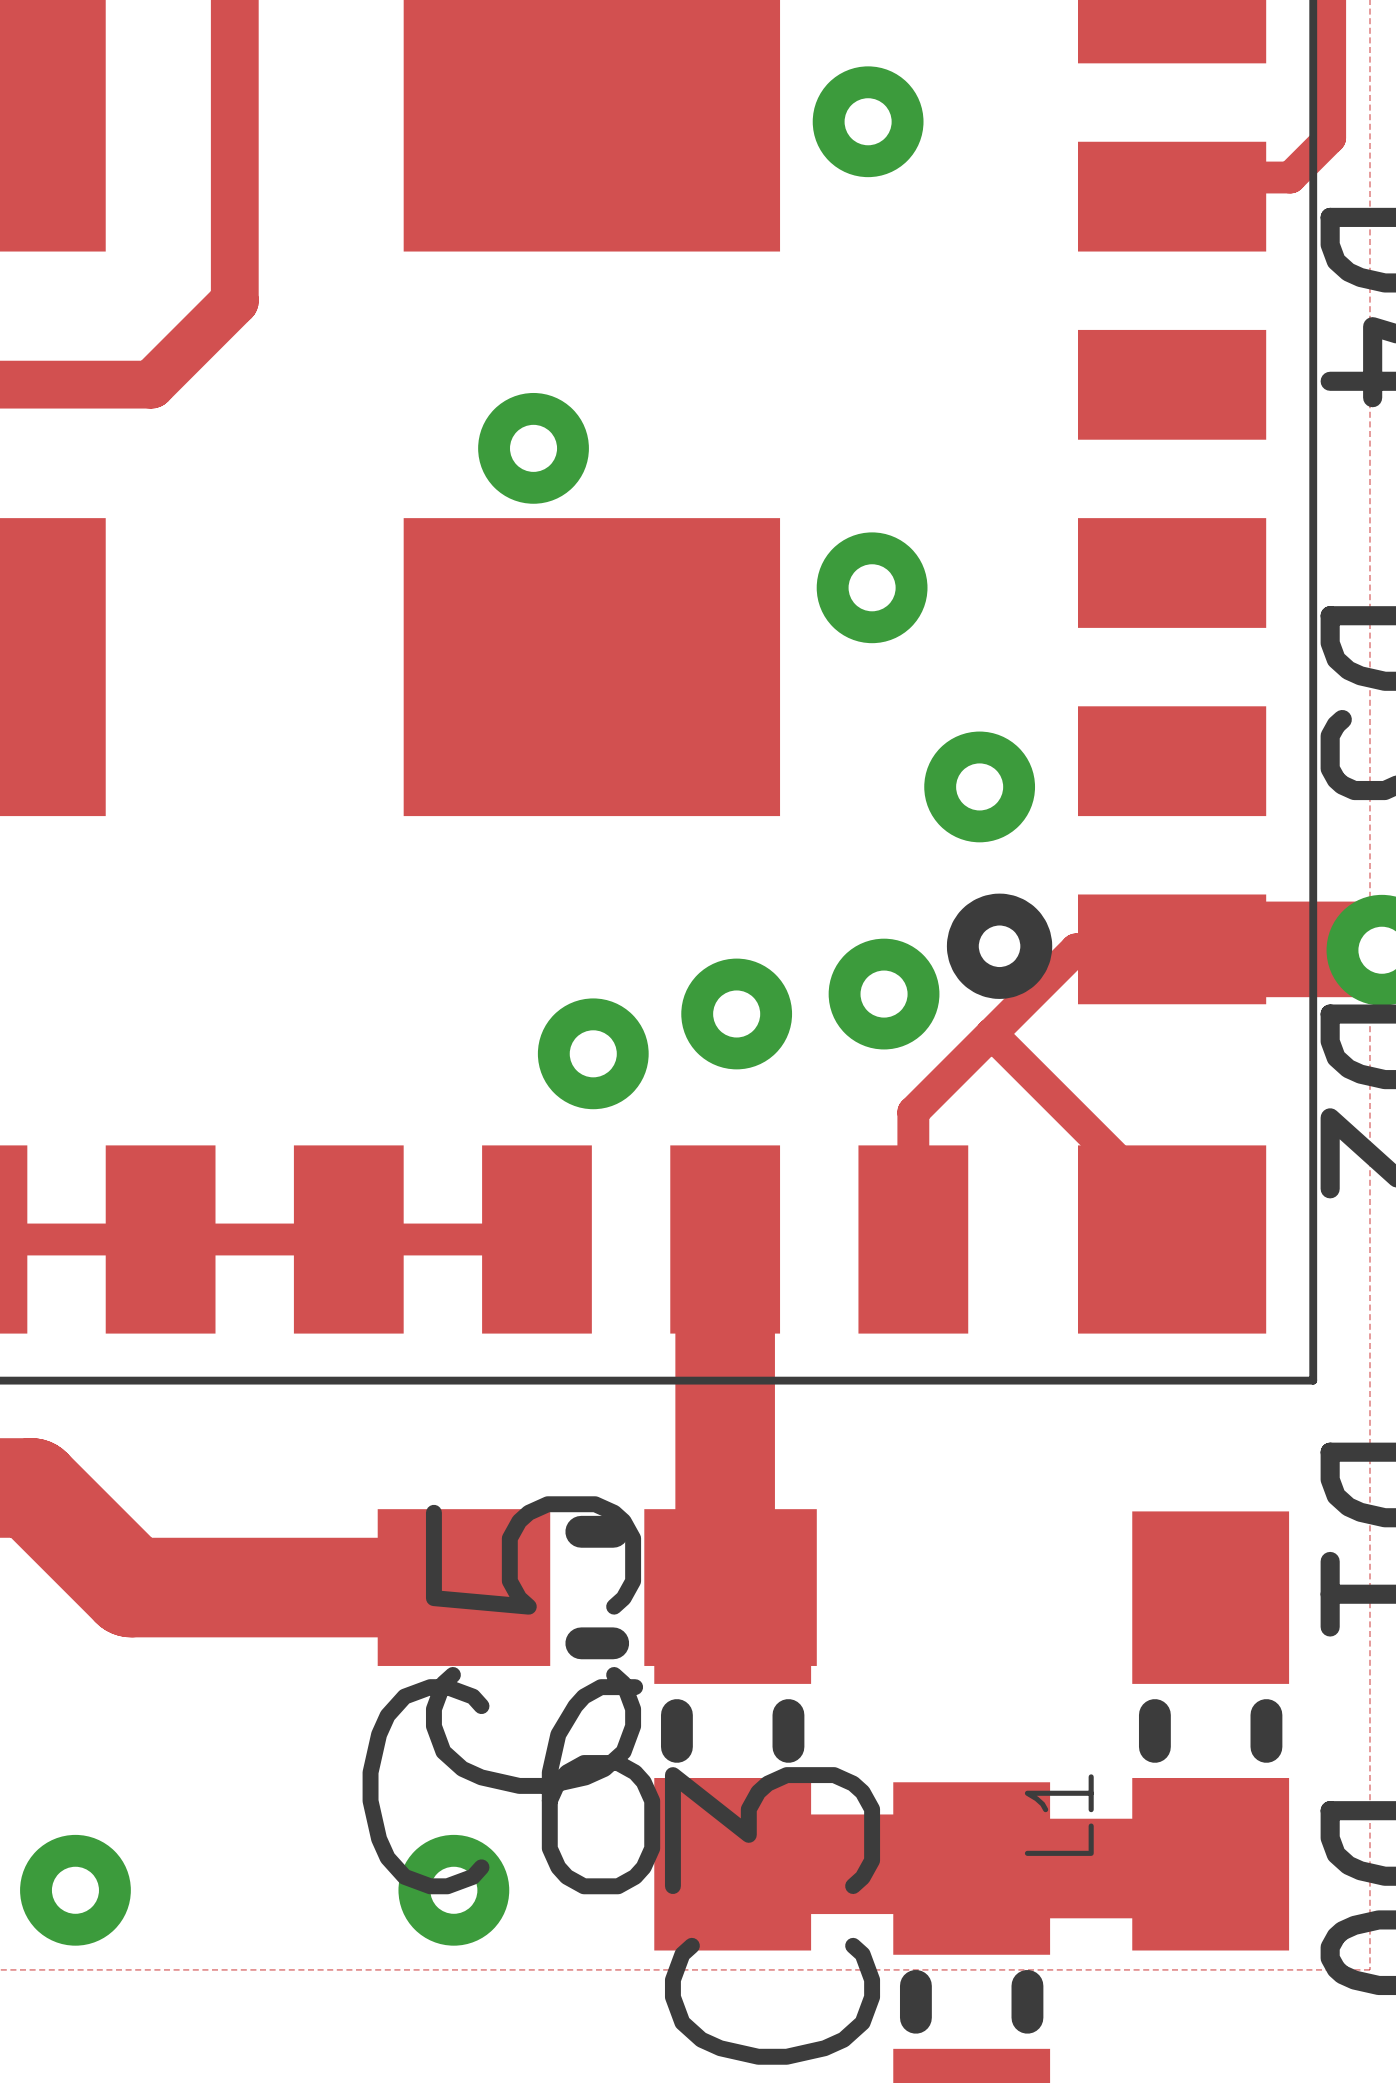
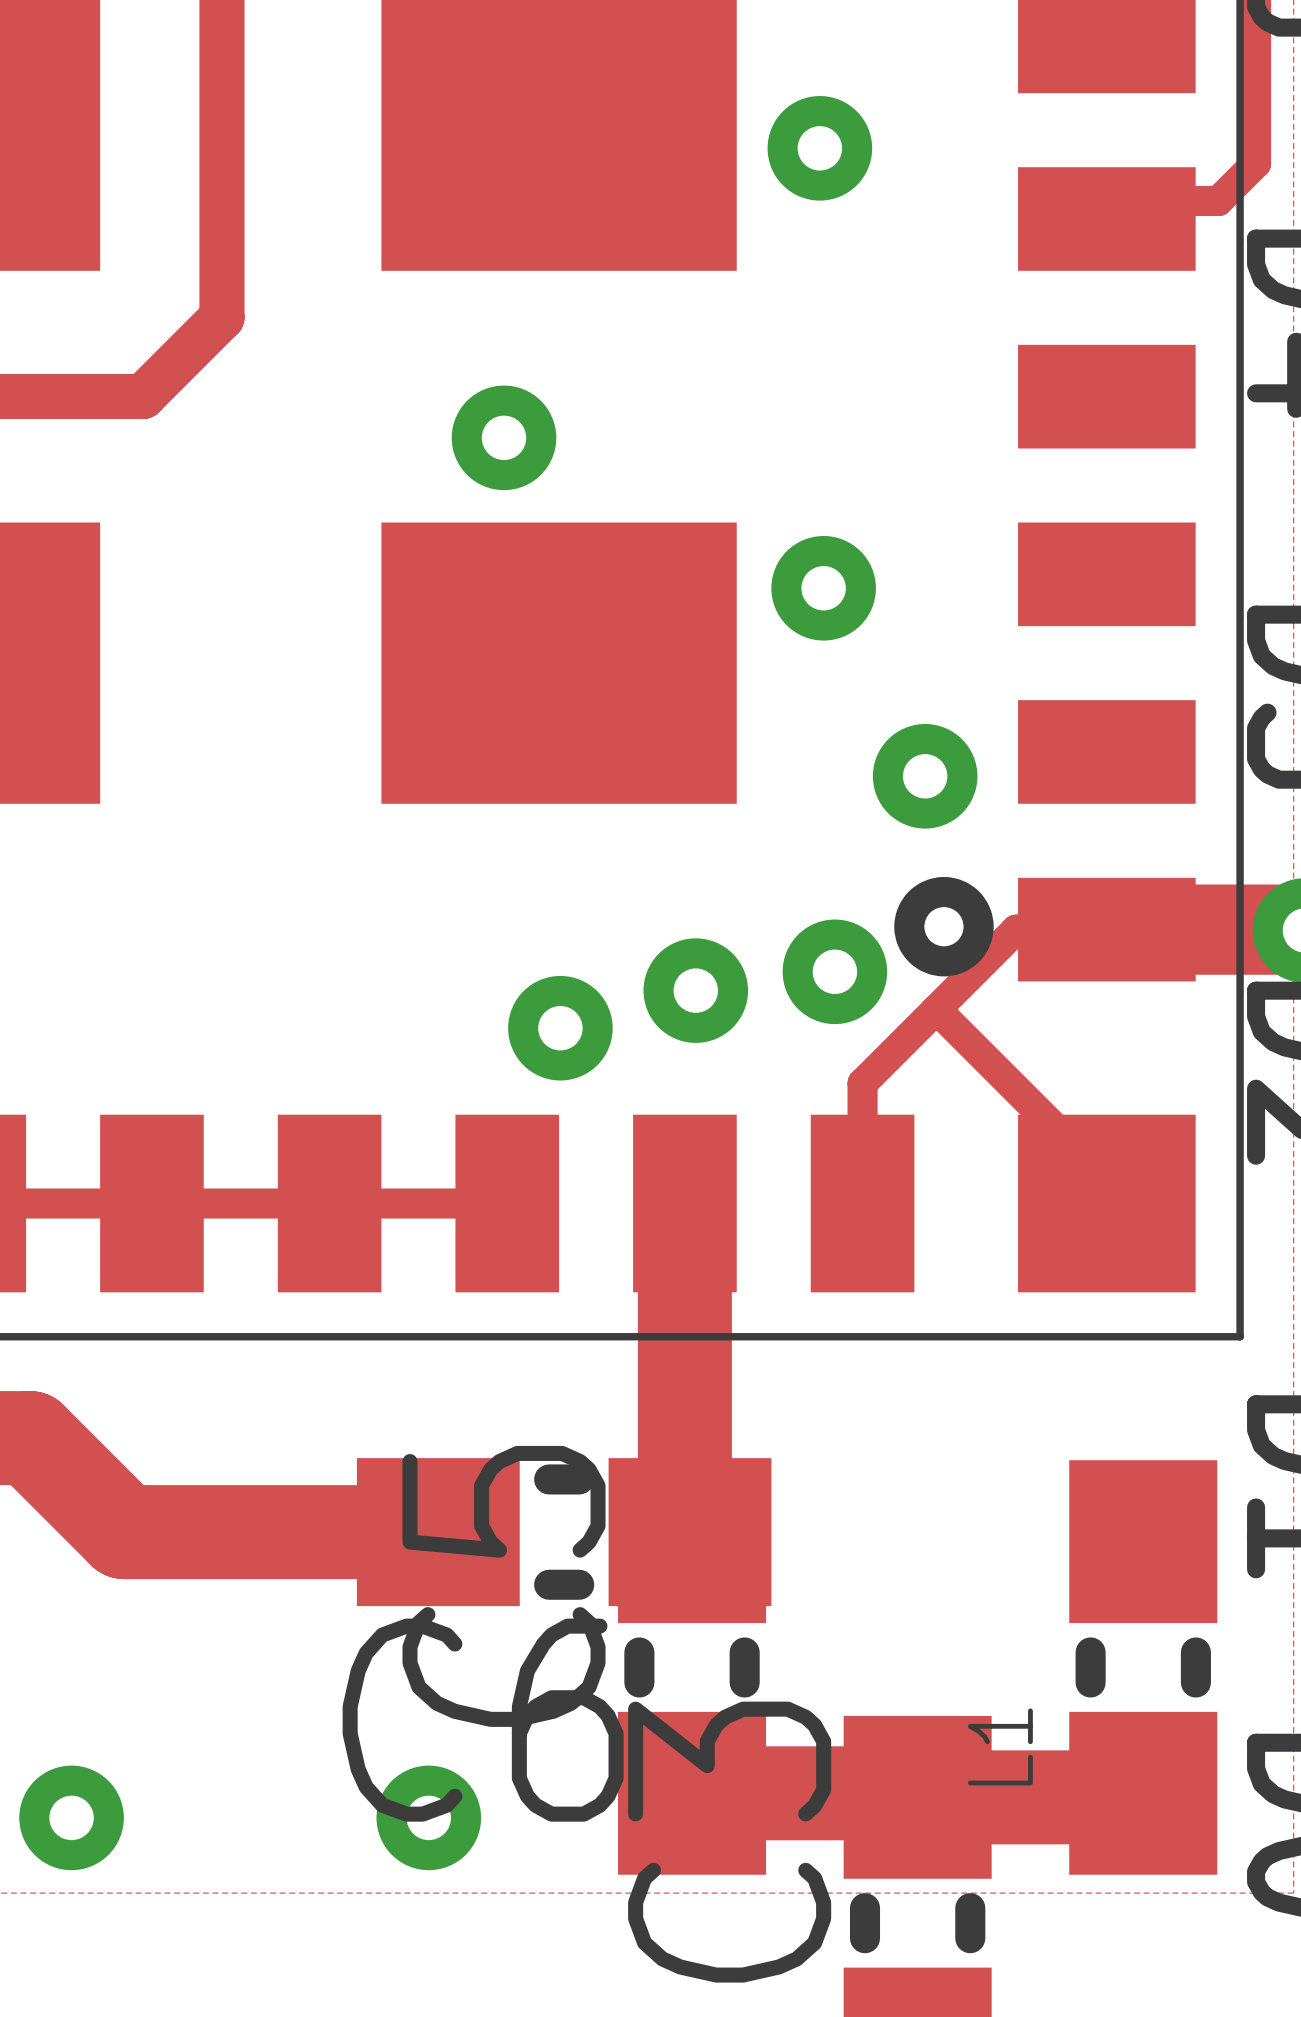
via position: (533, 448) -> (504, 437)

